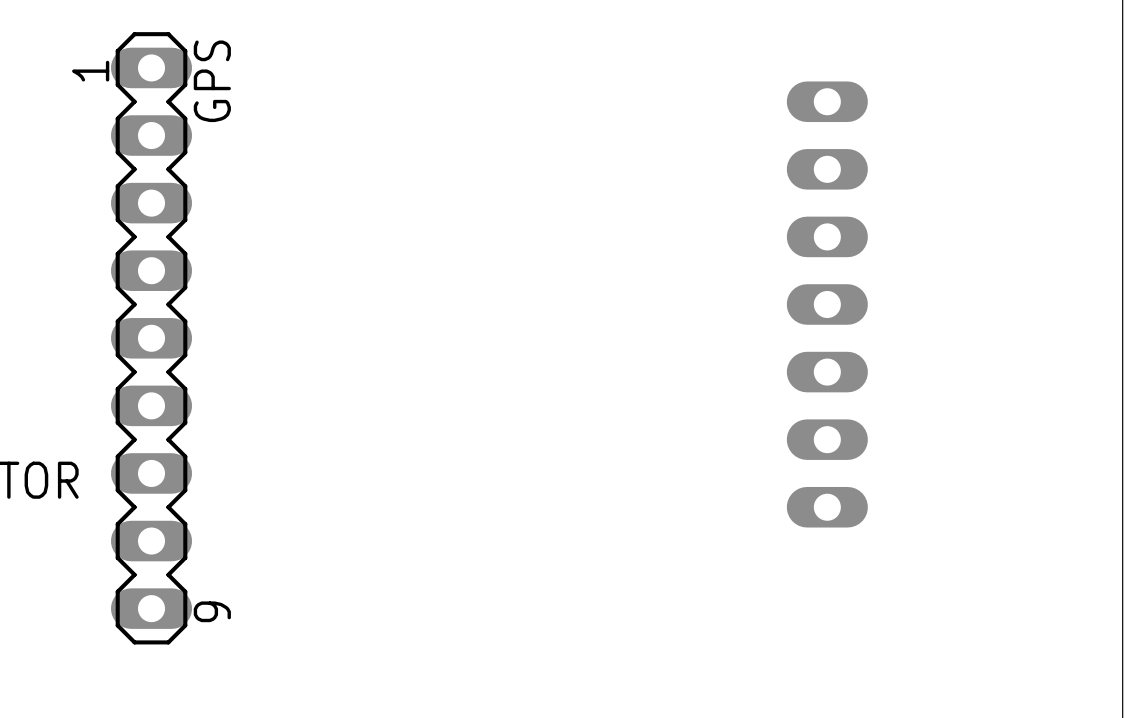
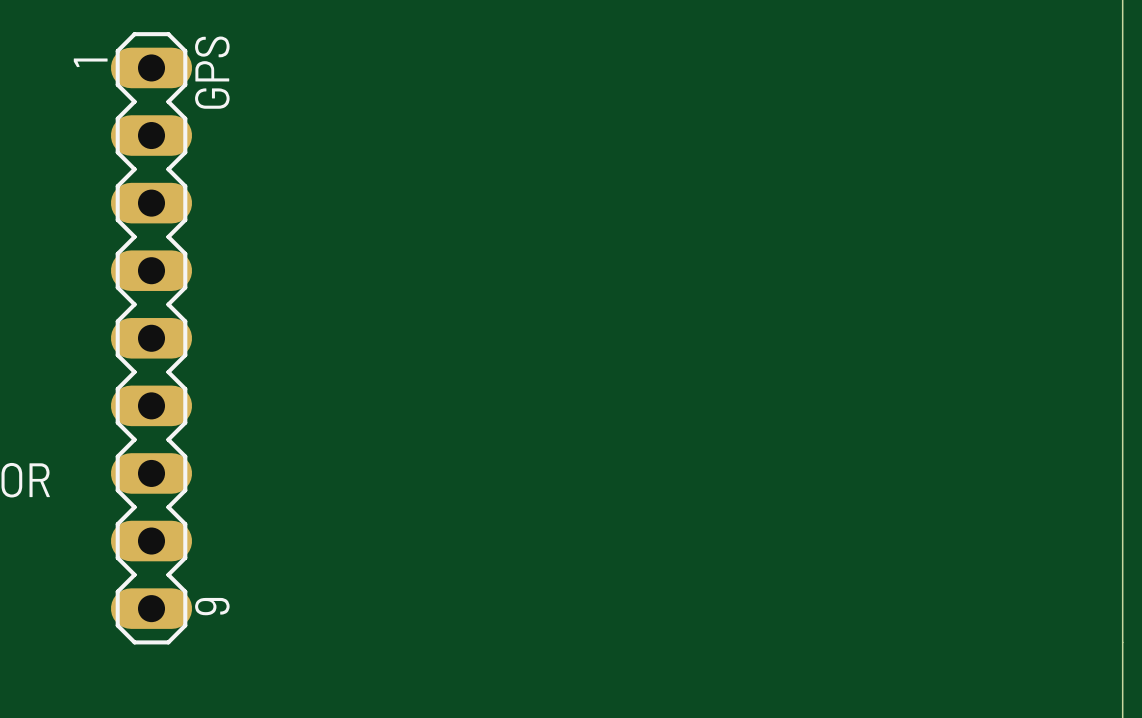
part: (827, 304) -> none

